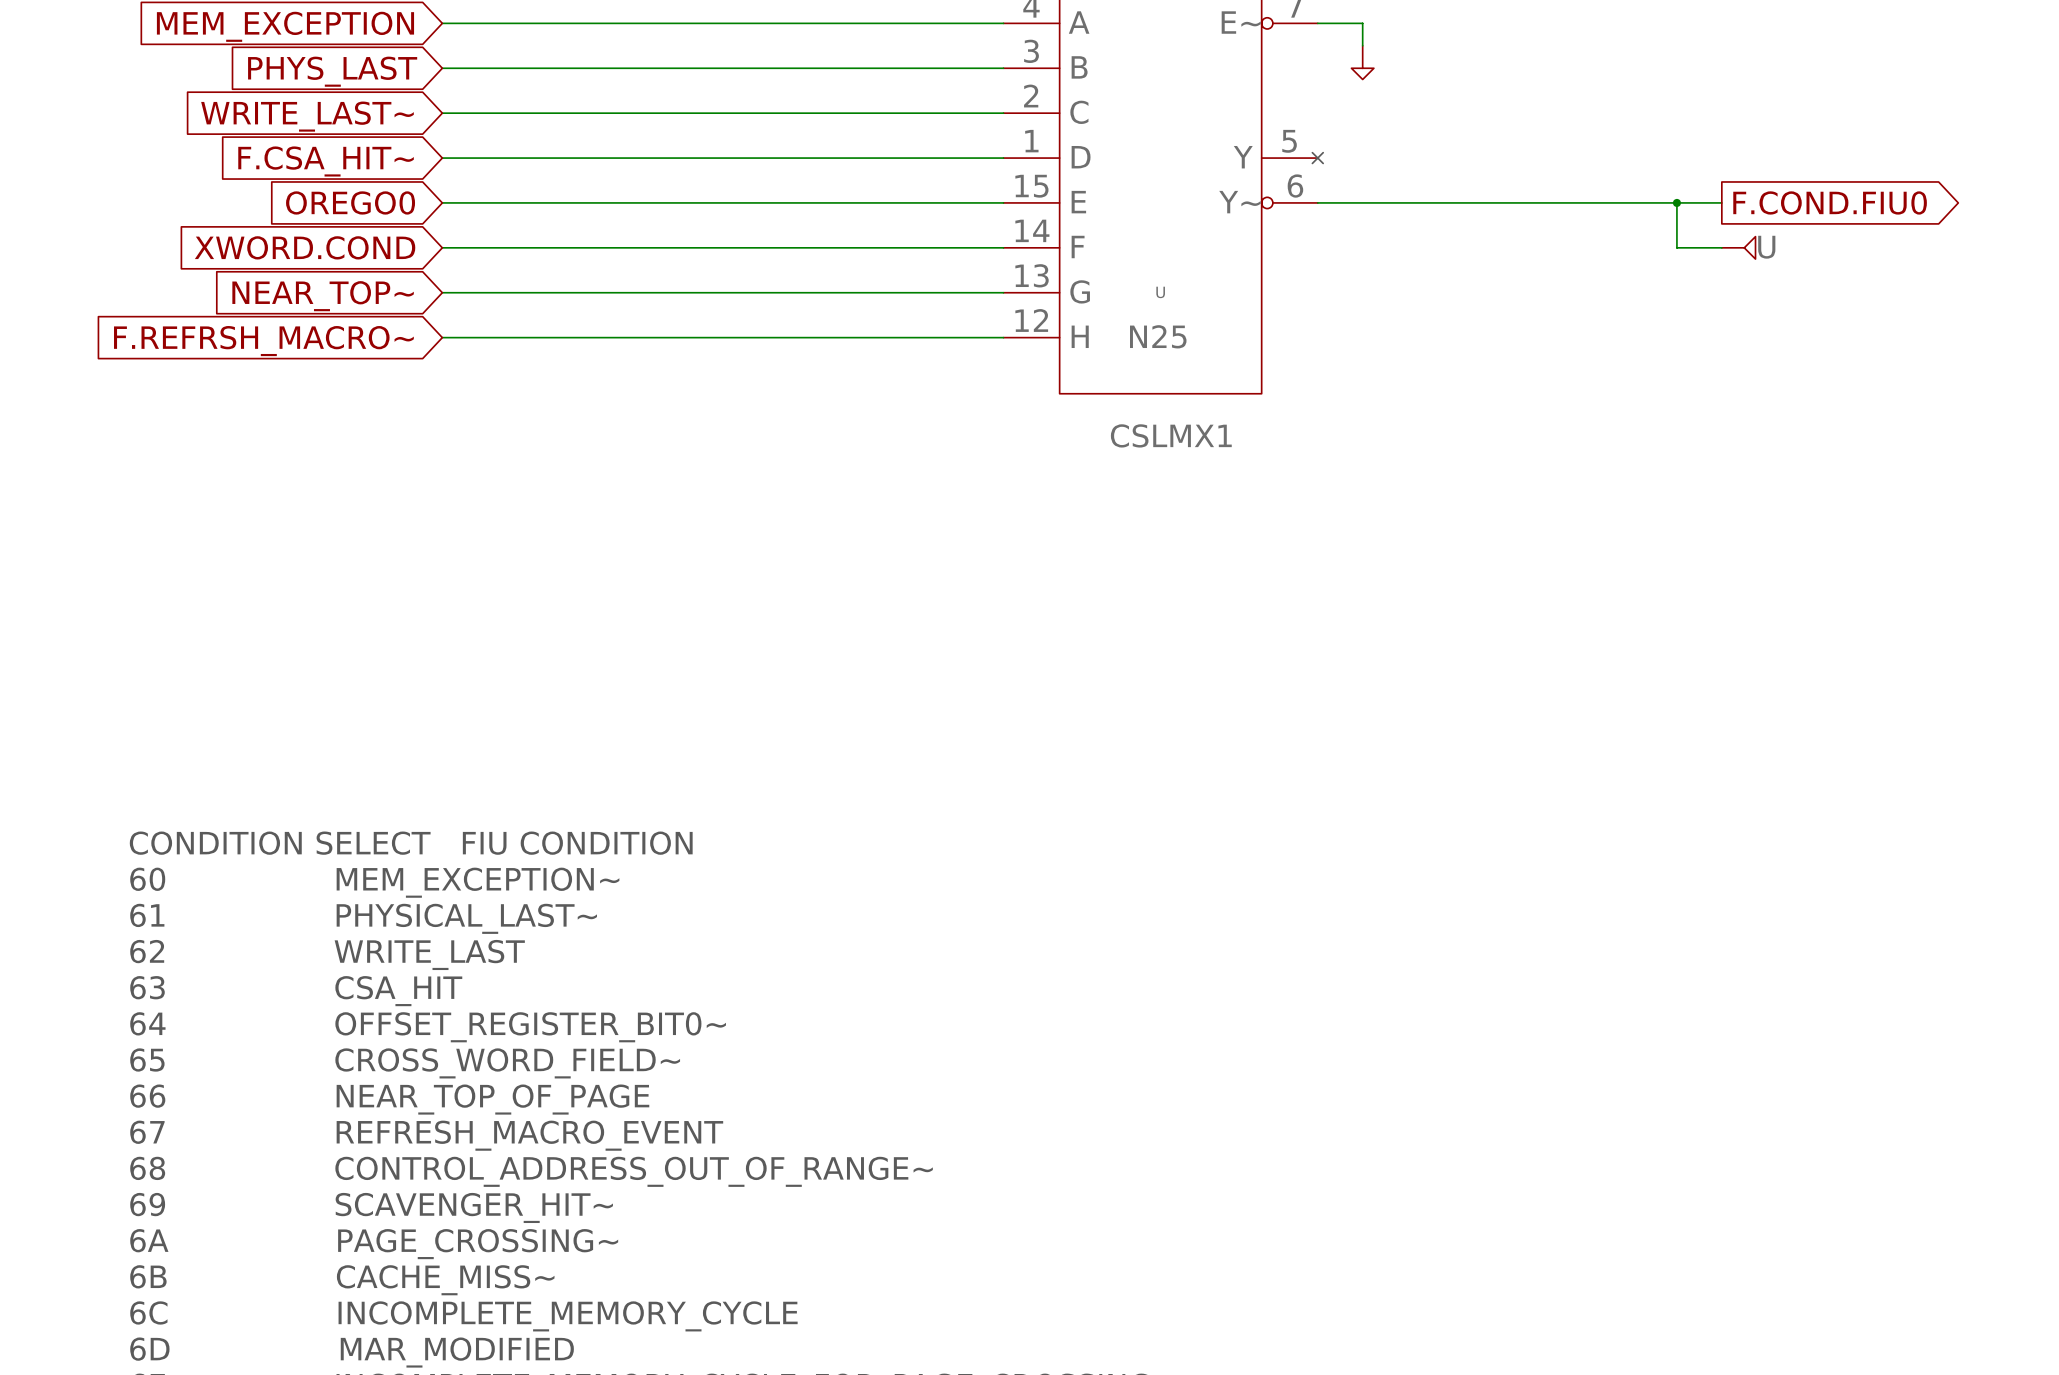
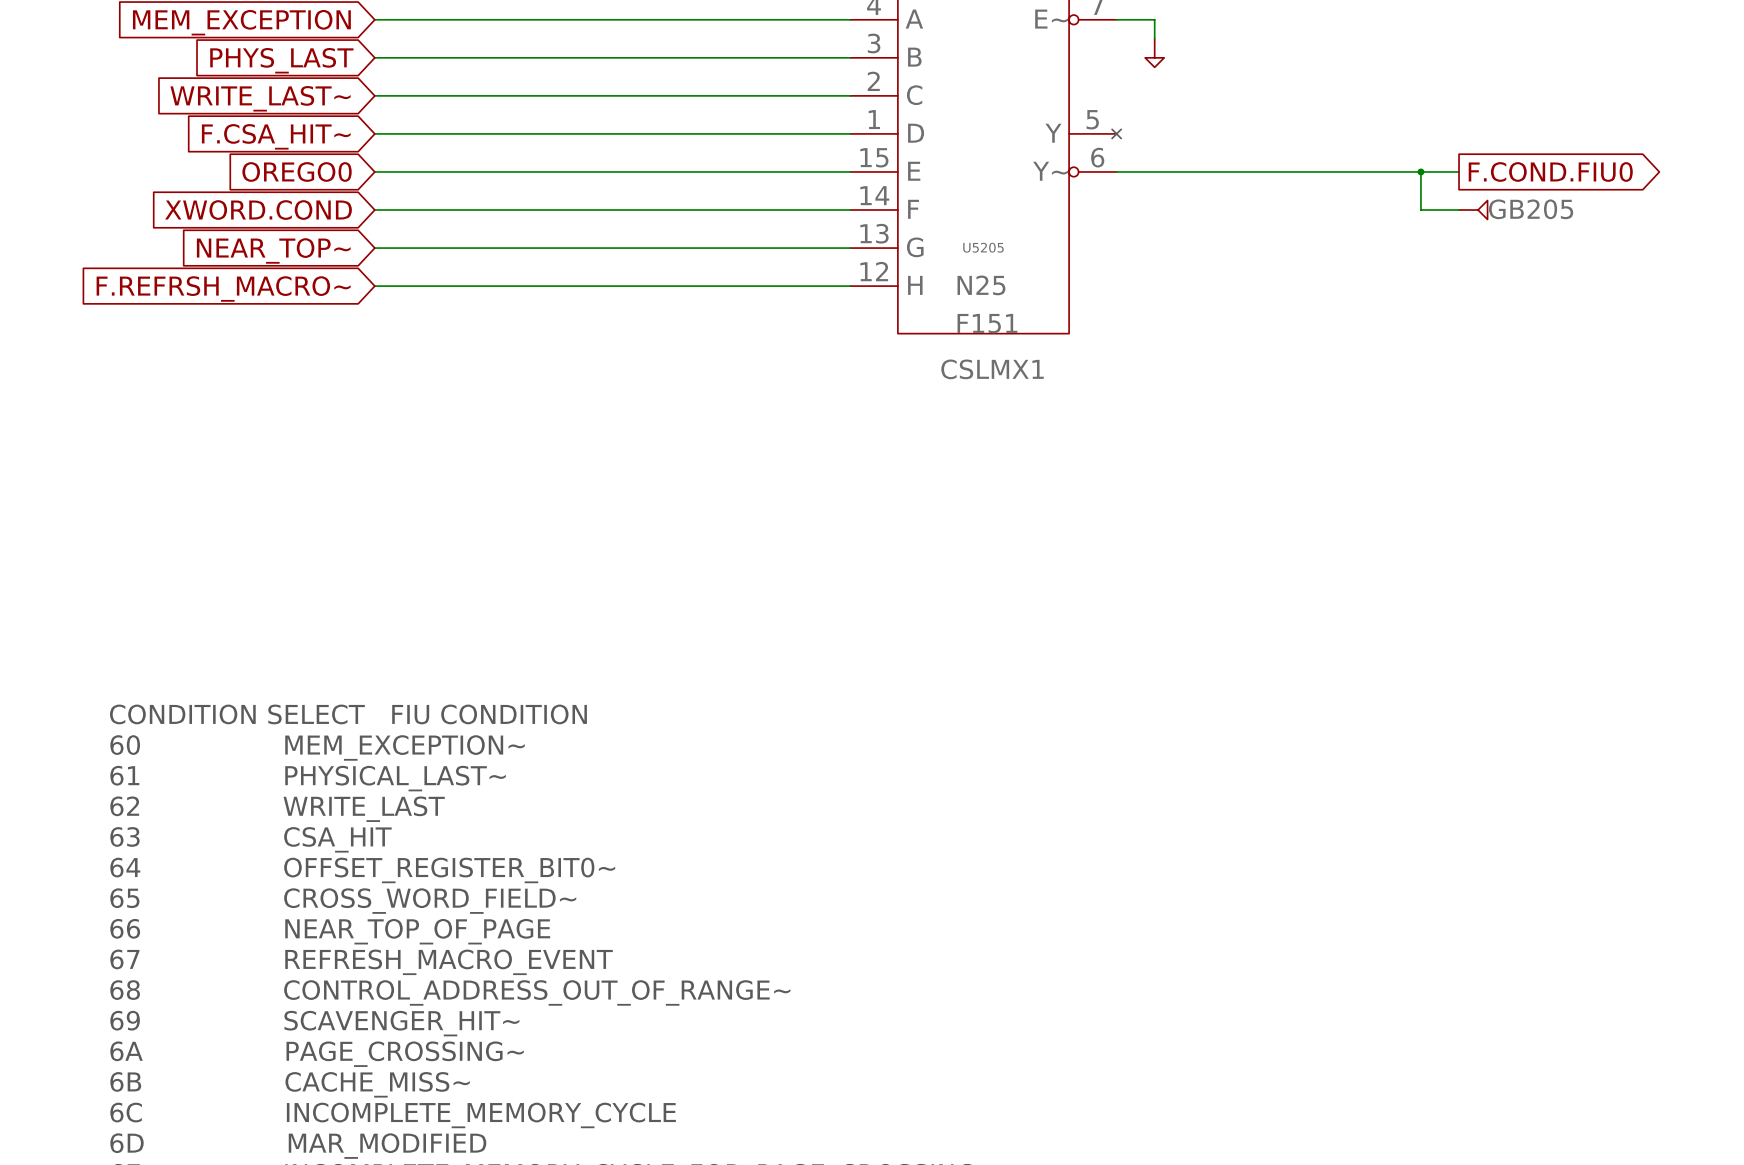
U name: U (1766, 247) -> GB205 (1531, 209)
U name: U (1160, 292) -> U5205 (983, 247)
U value: none -> F151 (987, 323)

